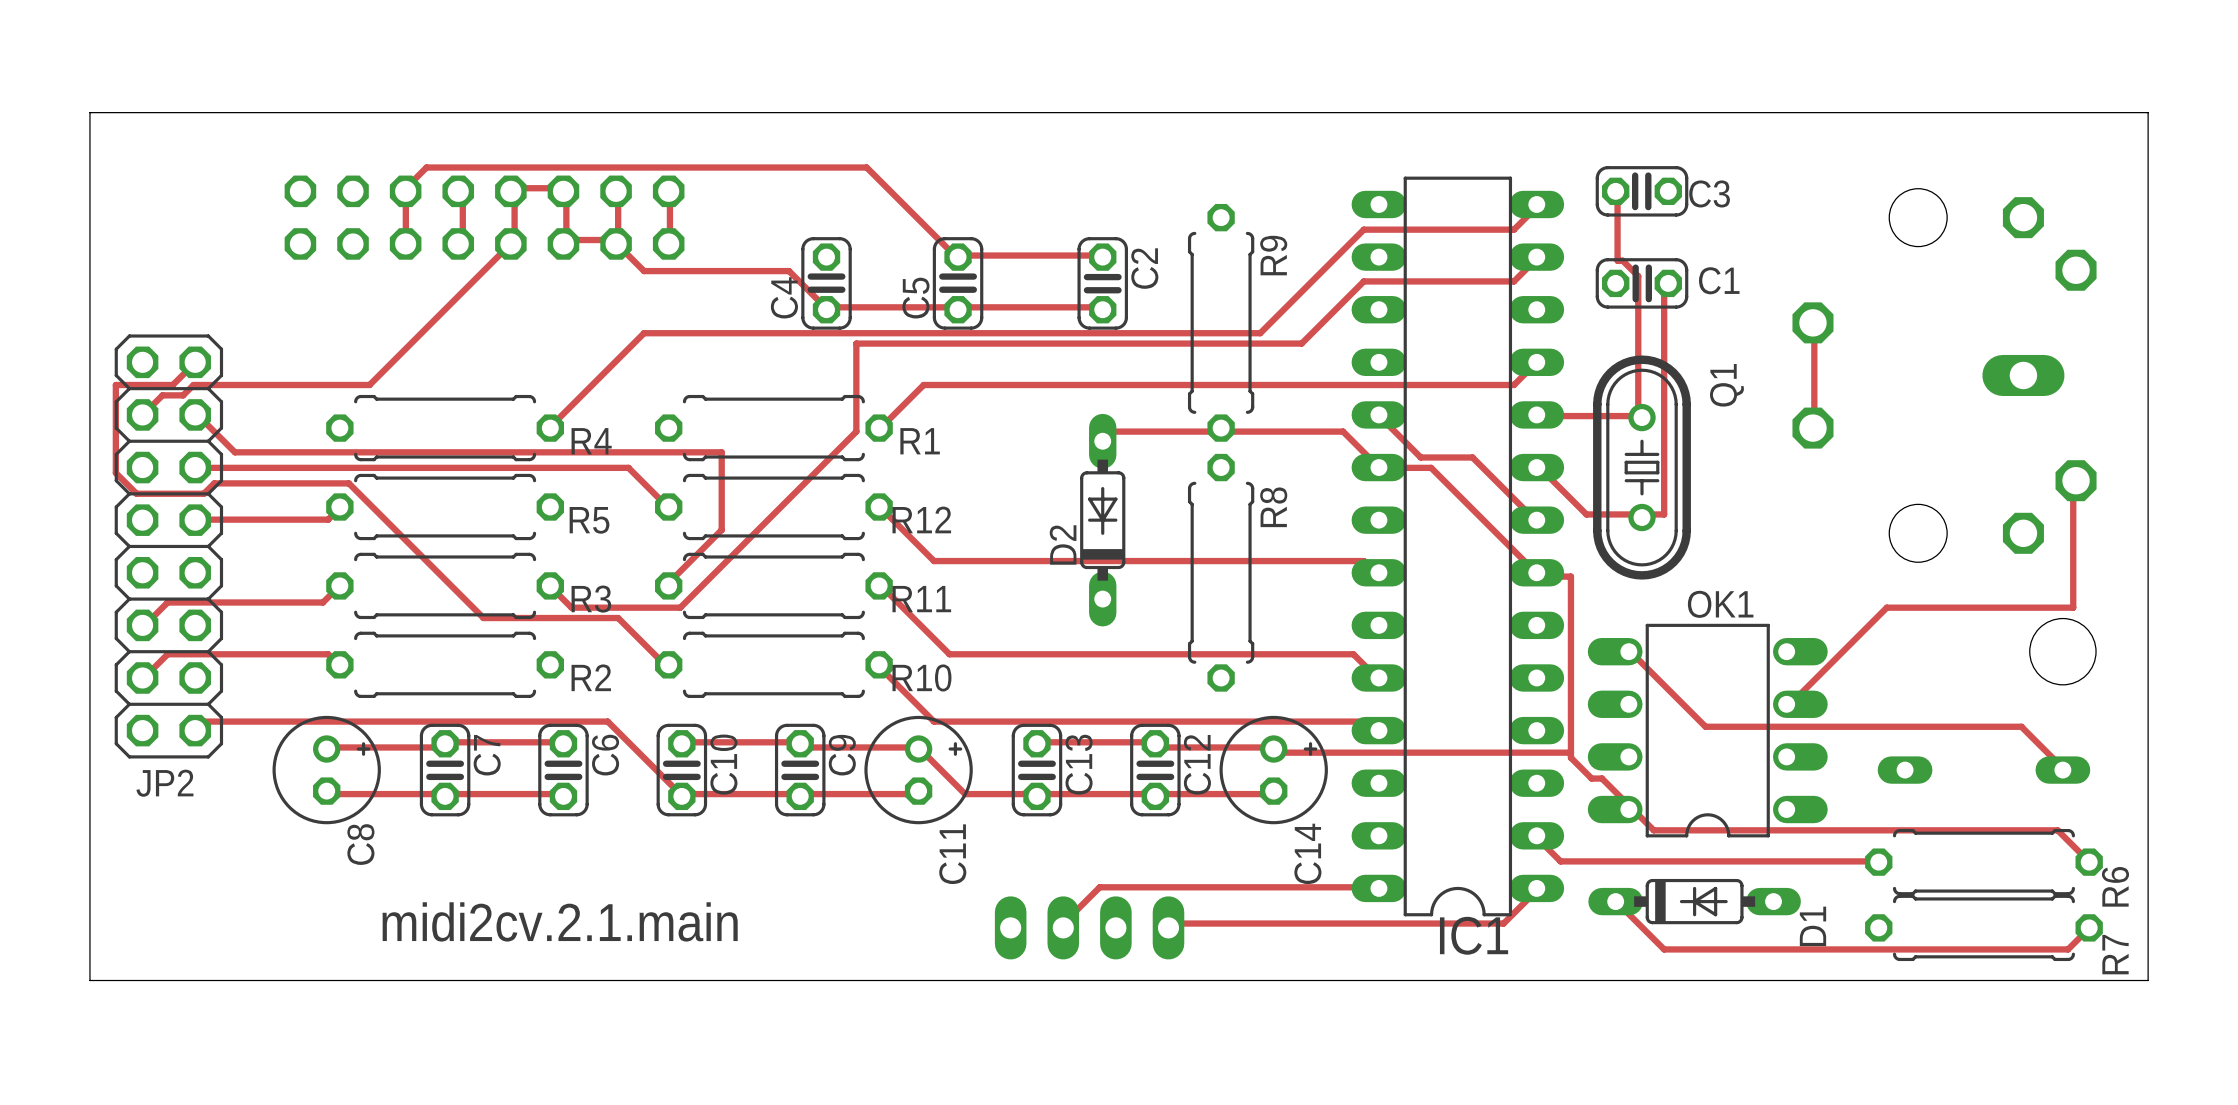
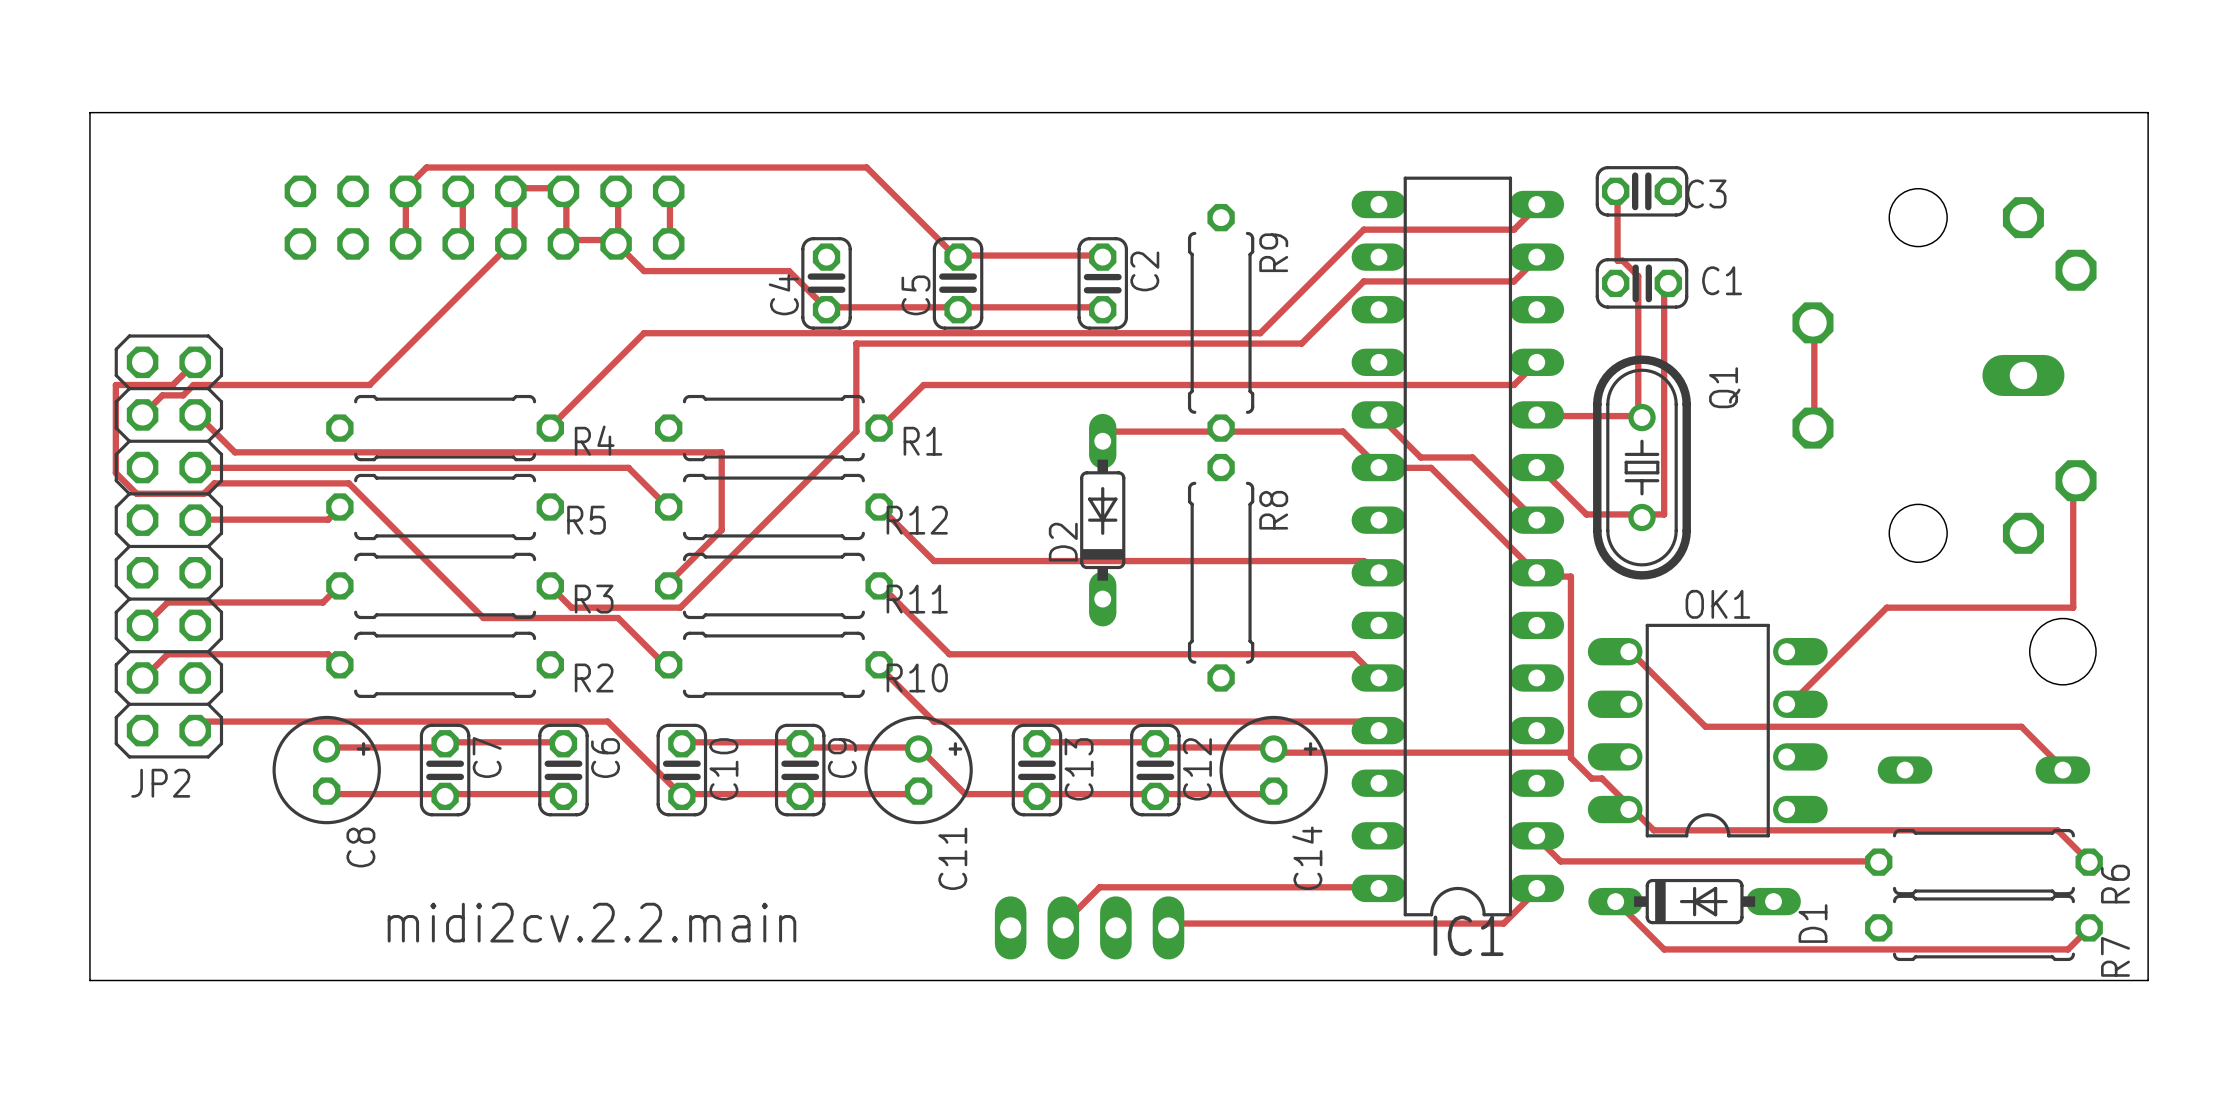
text: midi2cv.2.1.main (560, 921) -> midi2cv.2.2.main (591, 922)

